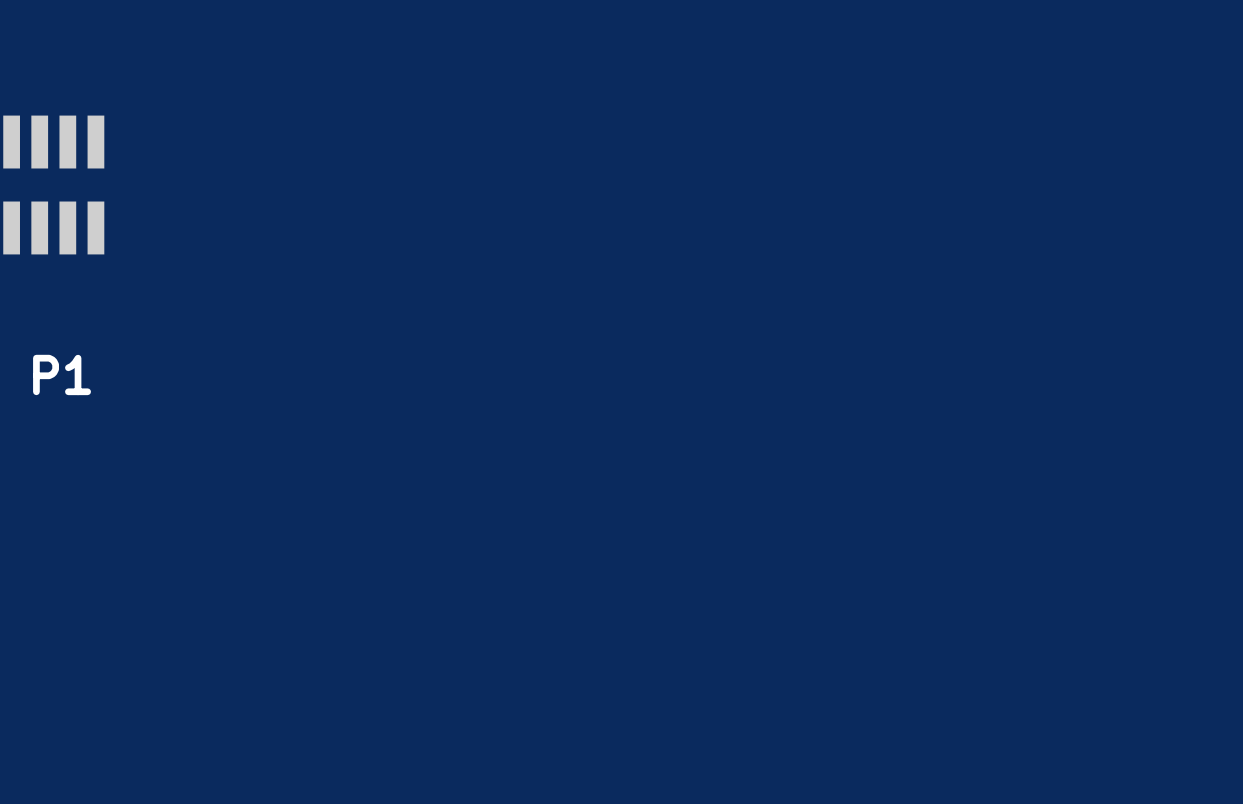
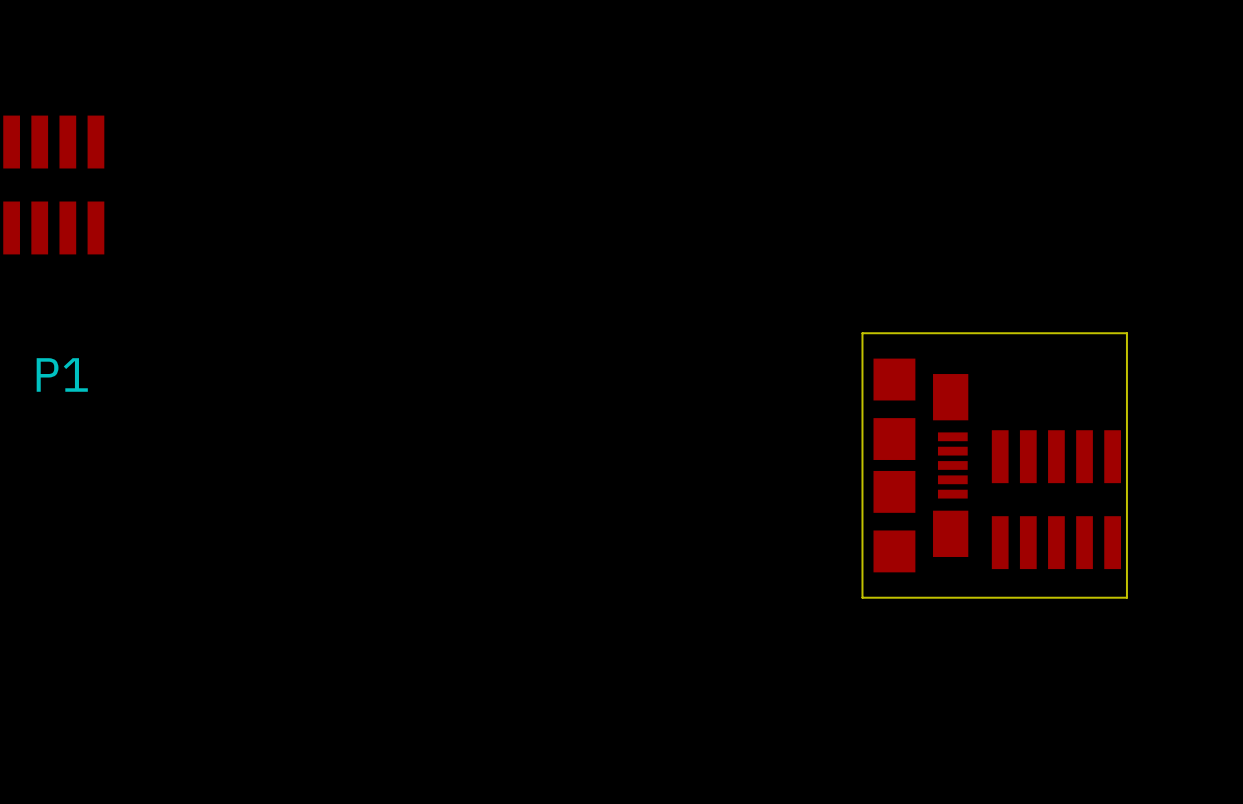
board edge: none -> (862, 333) (1126, 333) (1126, 597) (862, 597) (862, 333)
part: none -> (920, 465)
part: none -> (1056, 499)

